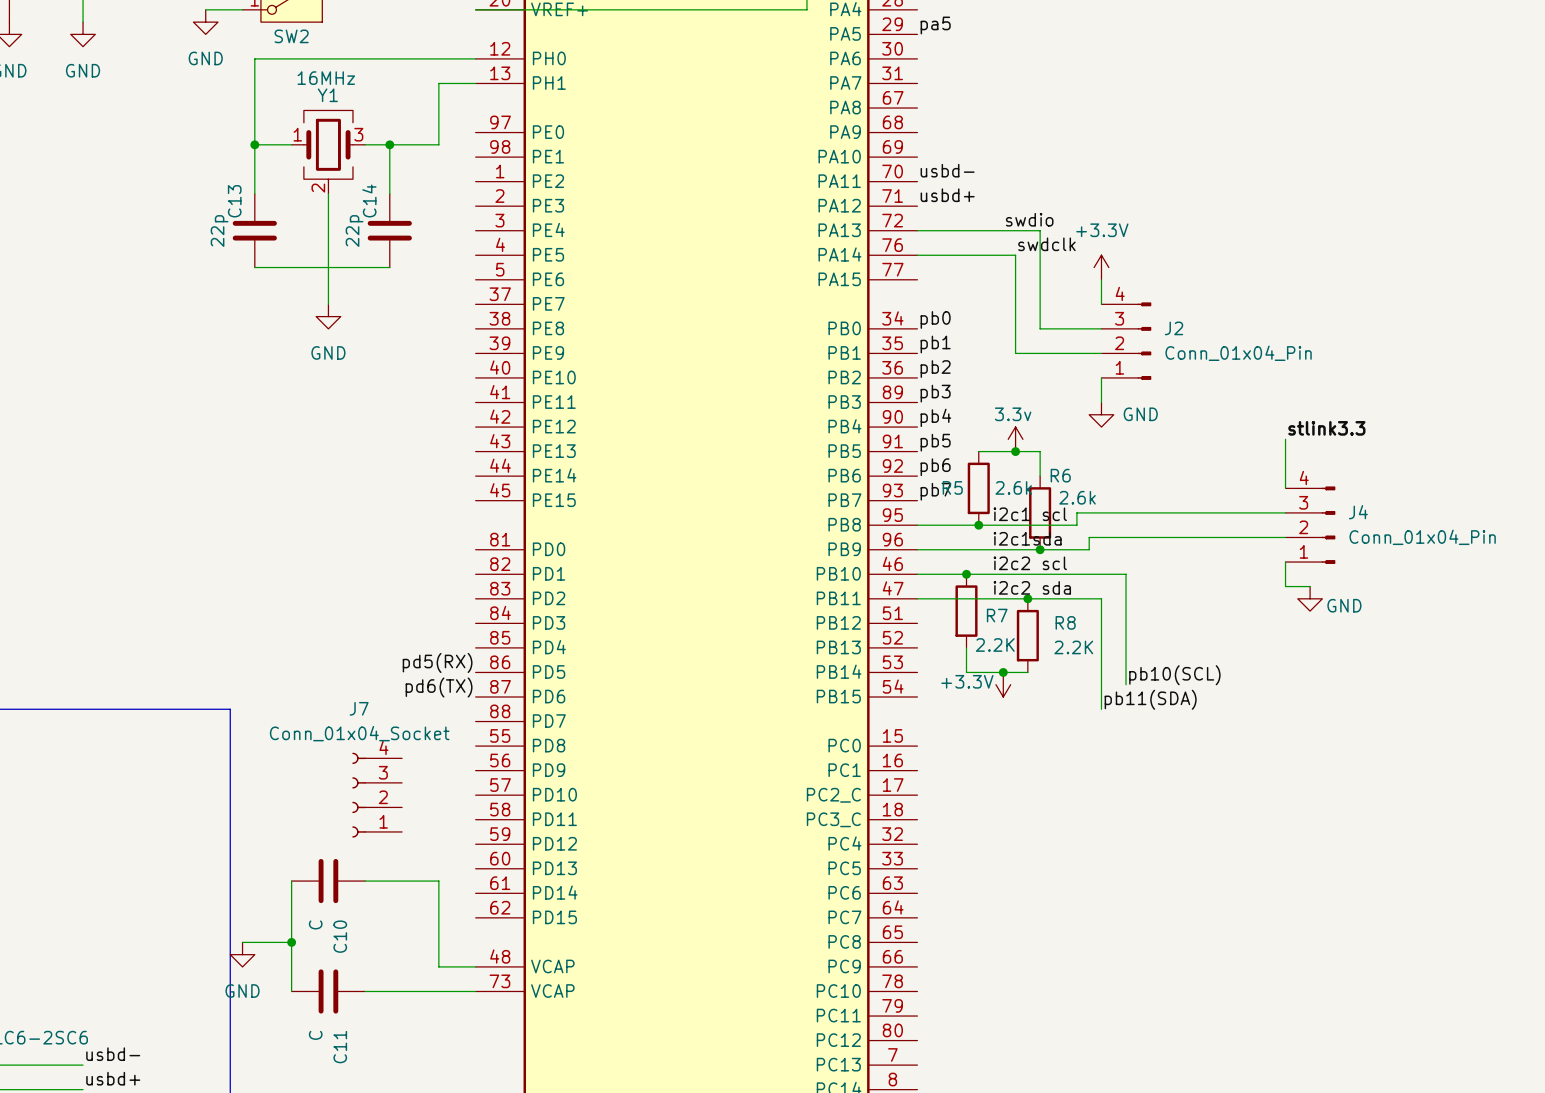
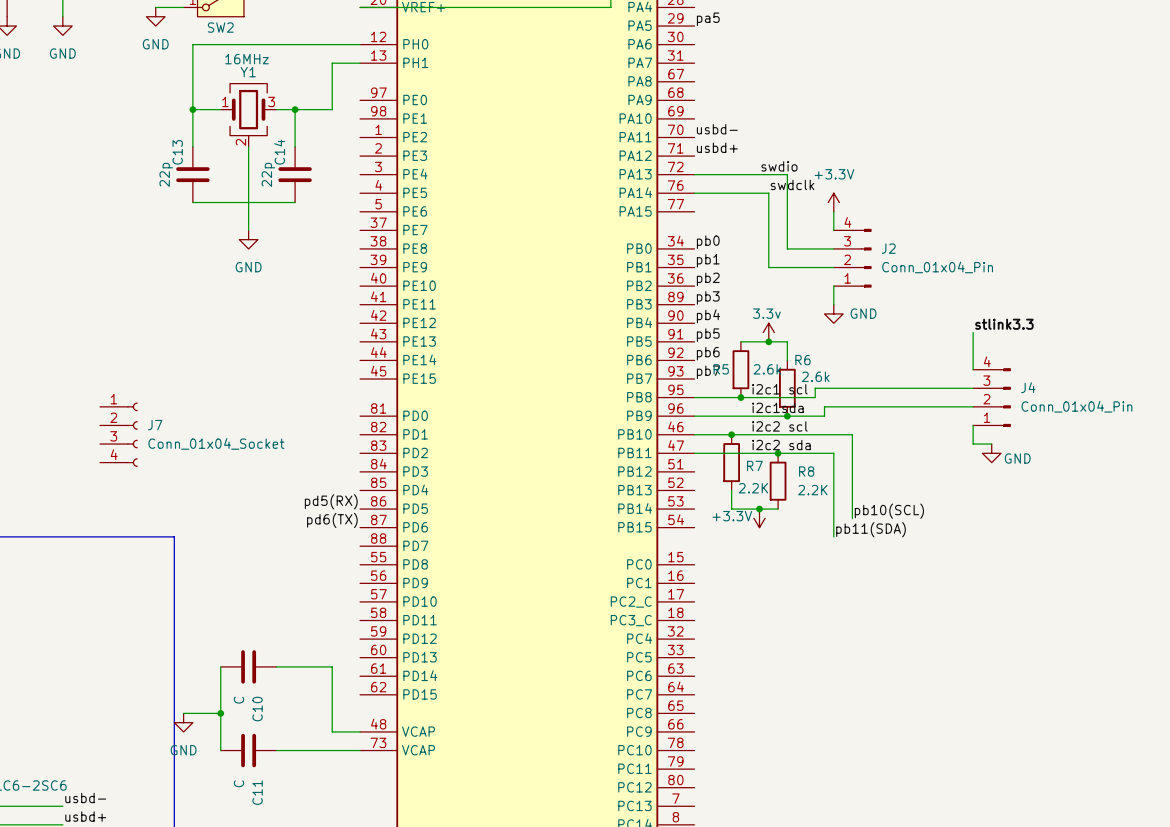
J7 name position: J7 (359, 708) -> J7 (155, 425)
J7 value position: Conn_01x04_Socket (359, 733) -> Conn_01x04_Socket (216, 443)
J7 rotation: 0° (359, 795) -> 180° (132, 434)
J7 position: (377, 795) -> (118, 434)

